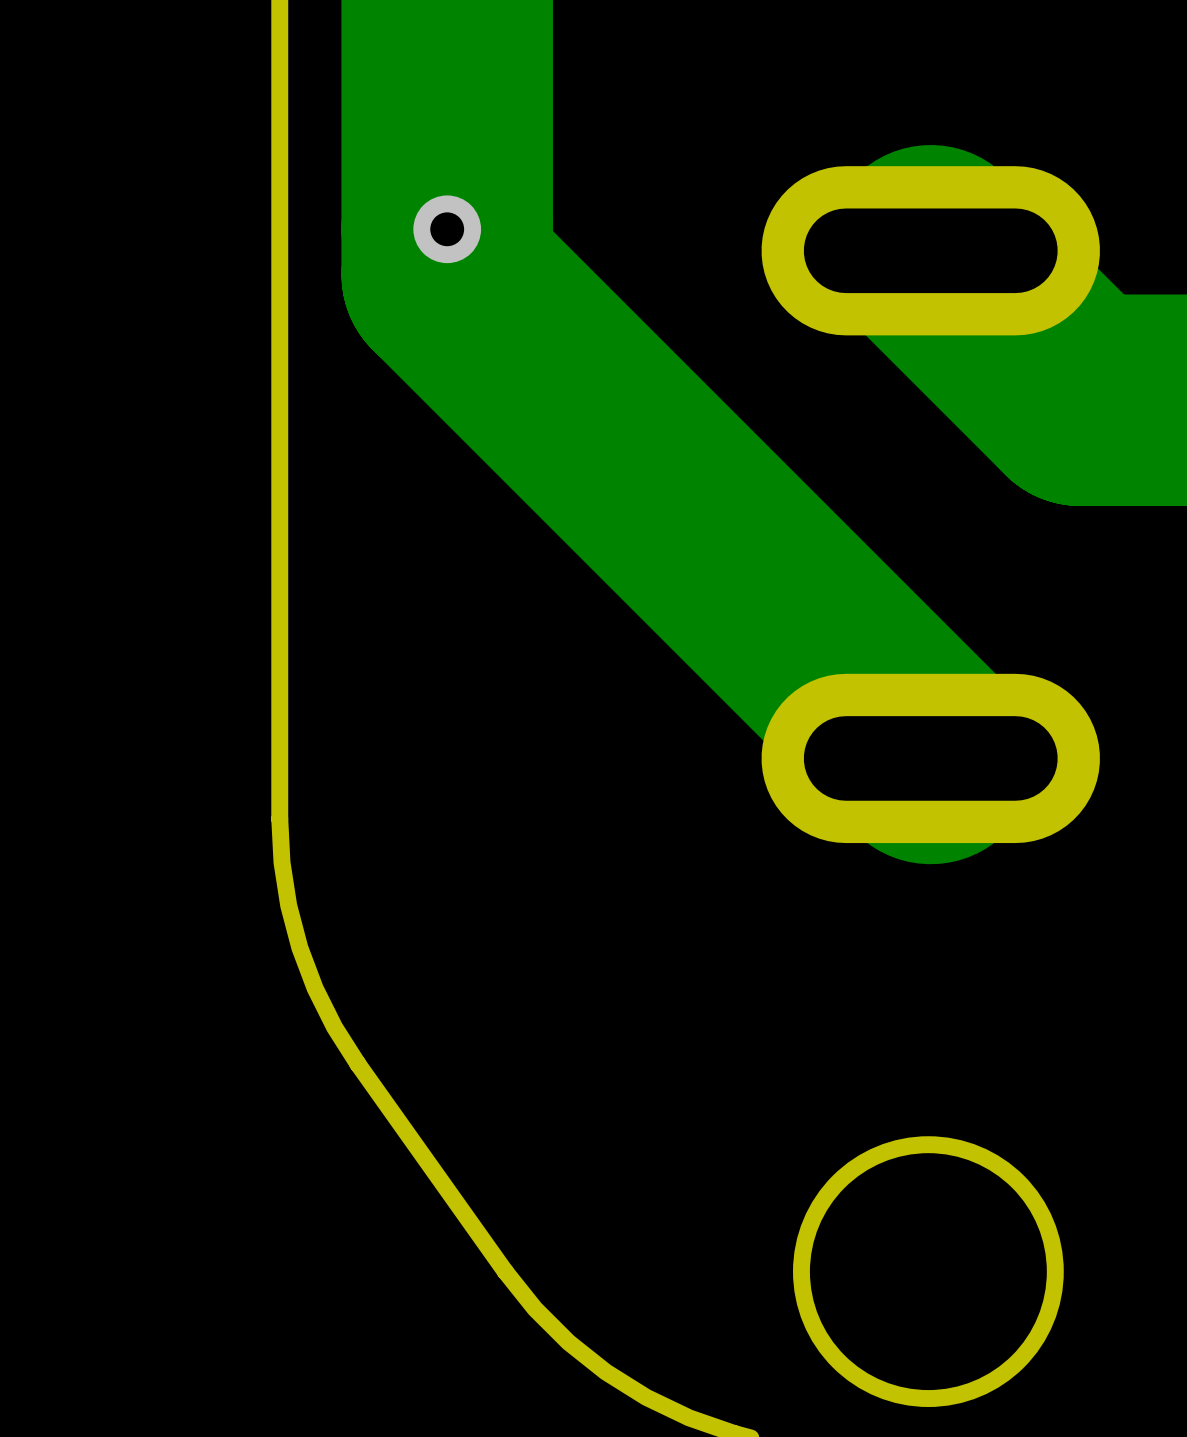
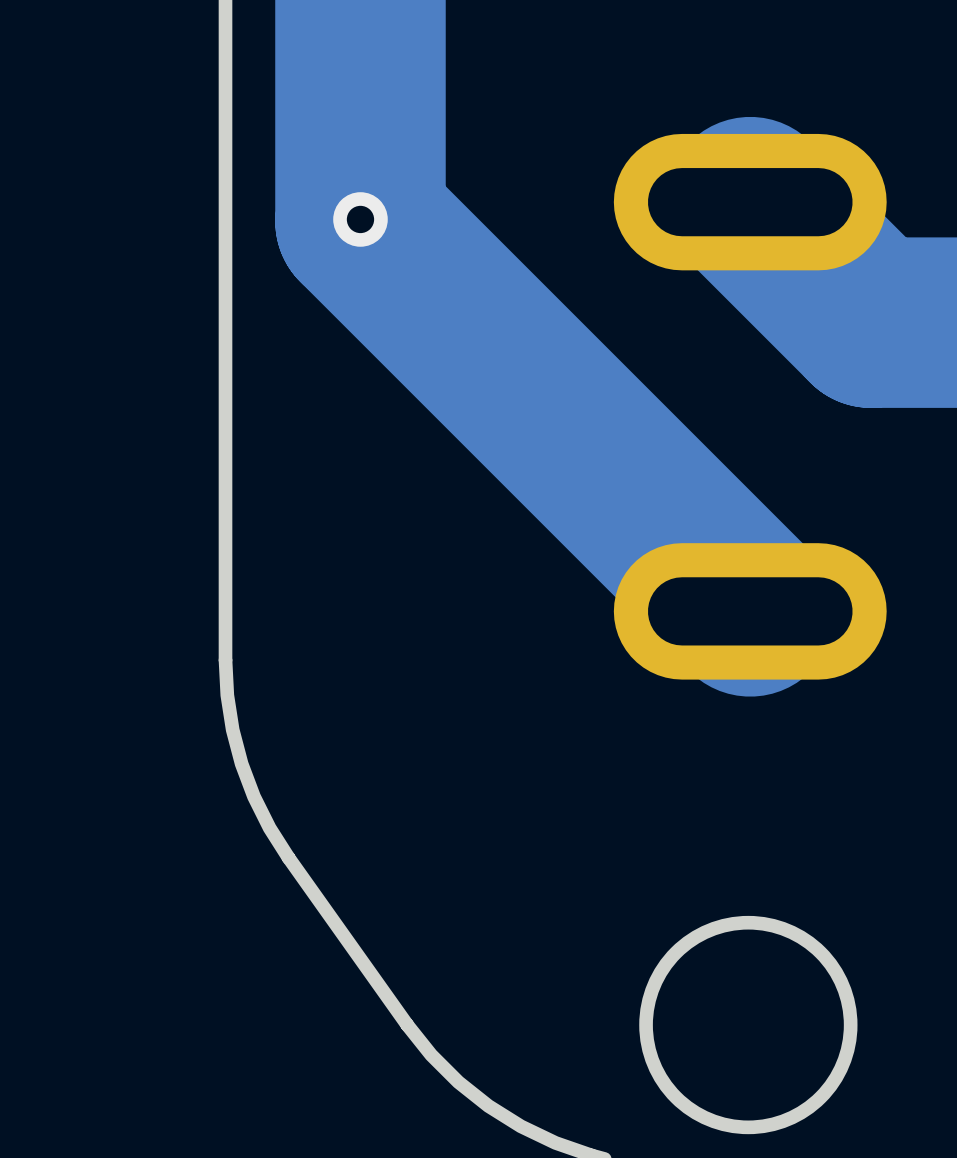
via position: (447, 229) -> (360, 219)

